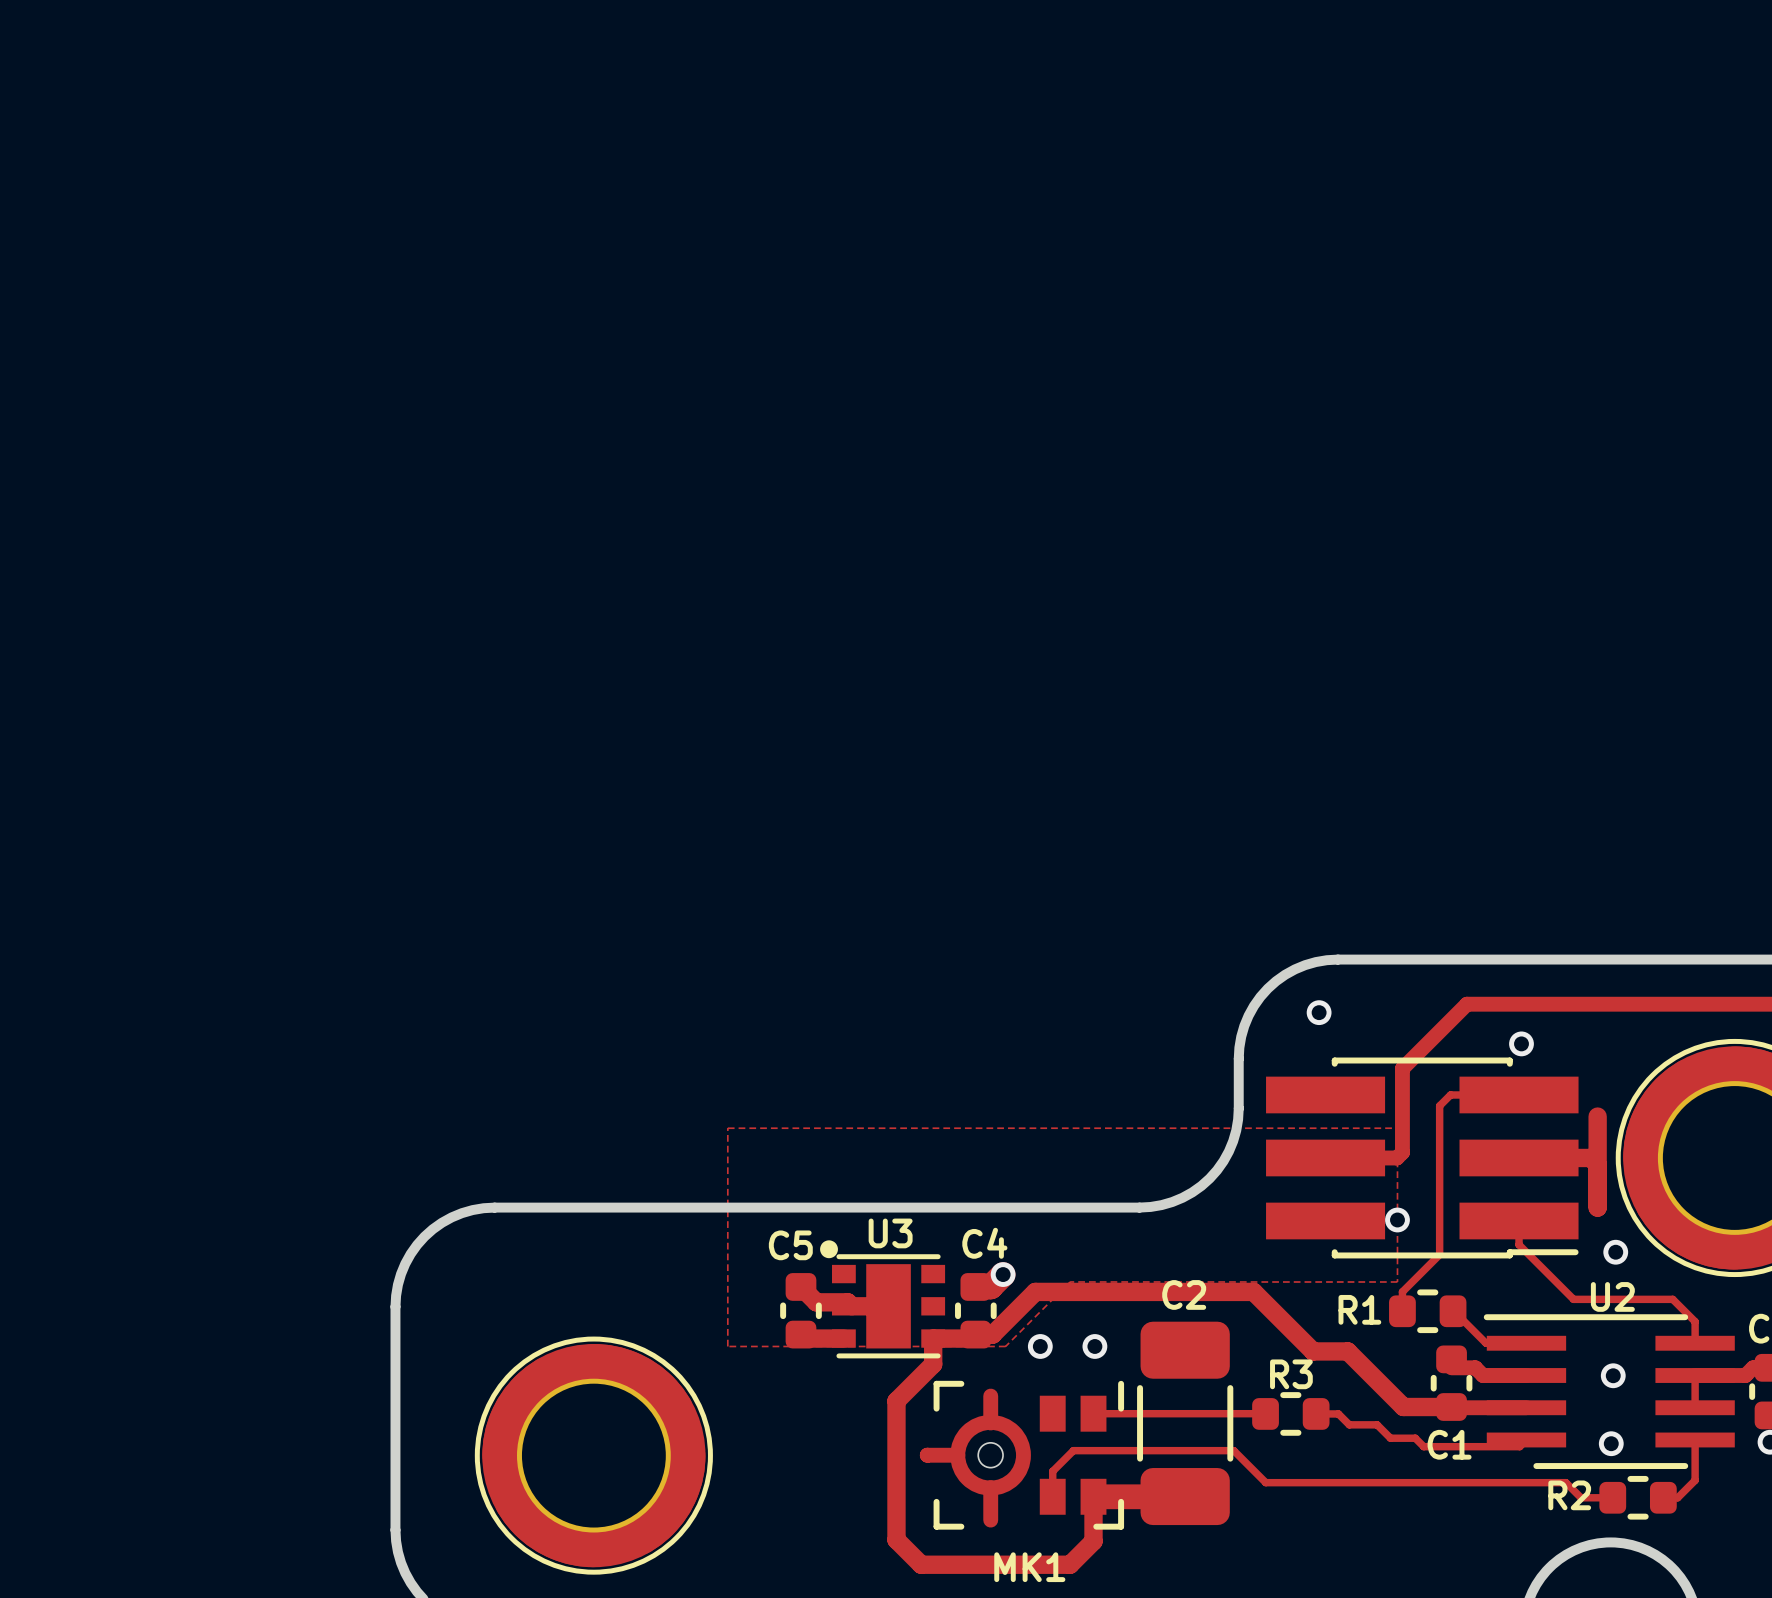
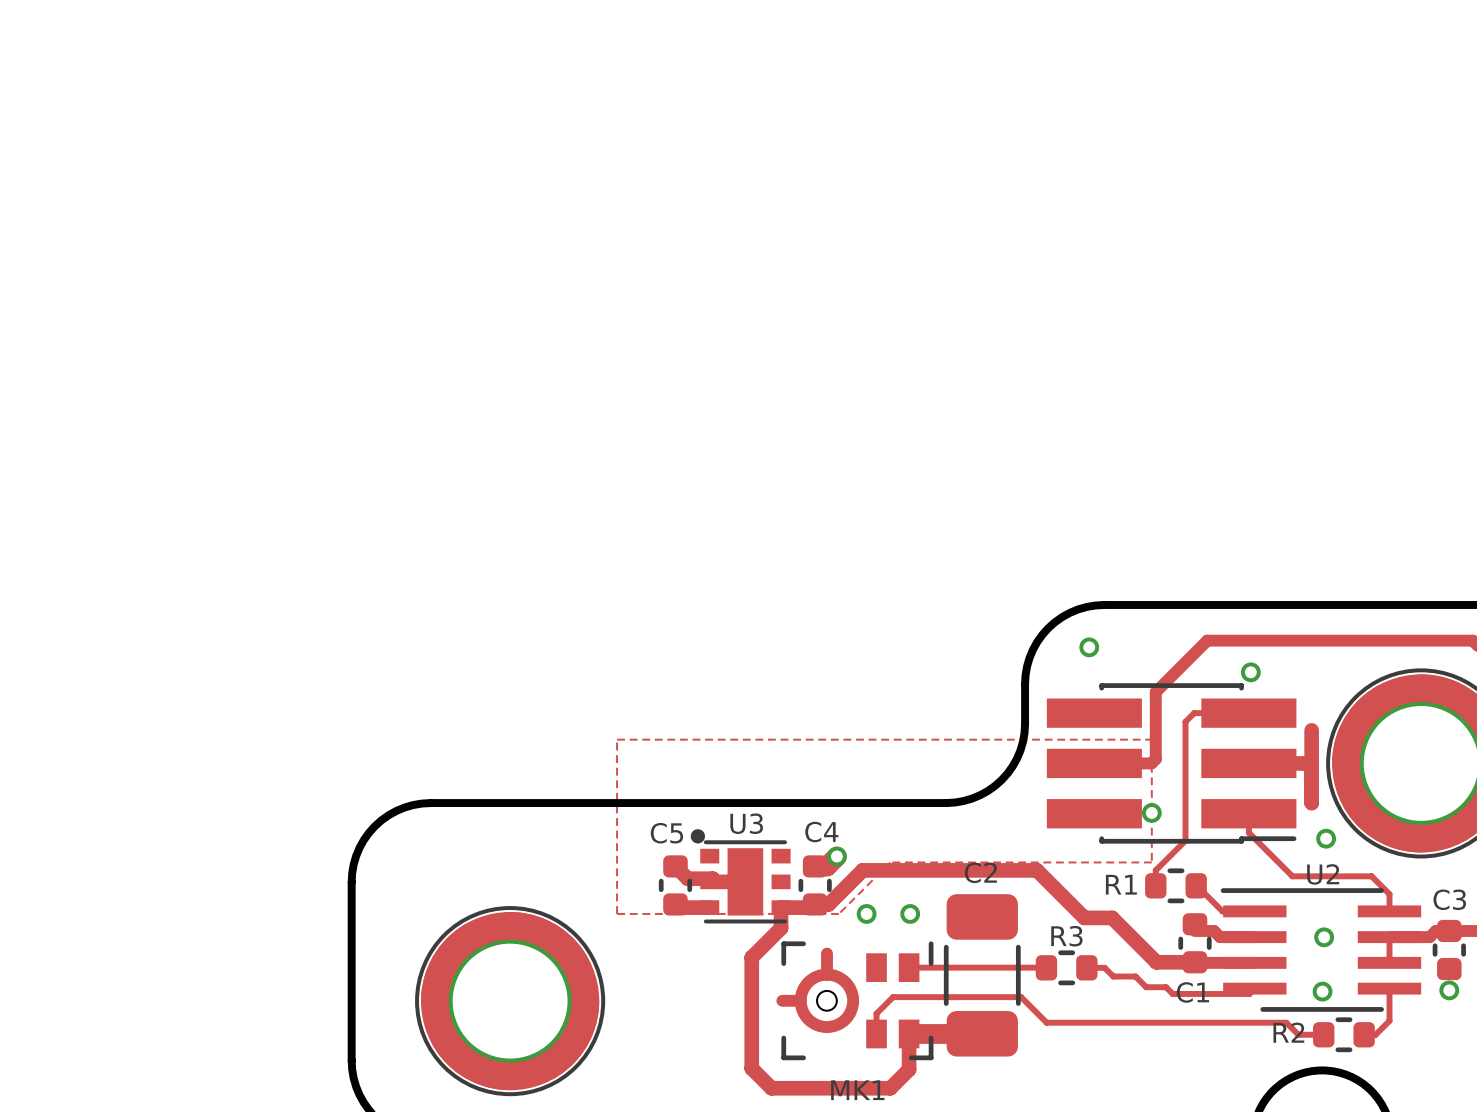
track: (927, 1455) (934, 1455) -> none
track: (990, 1487) (990, 1520) -> none

